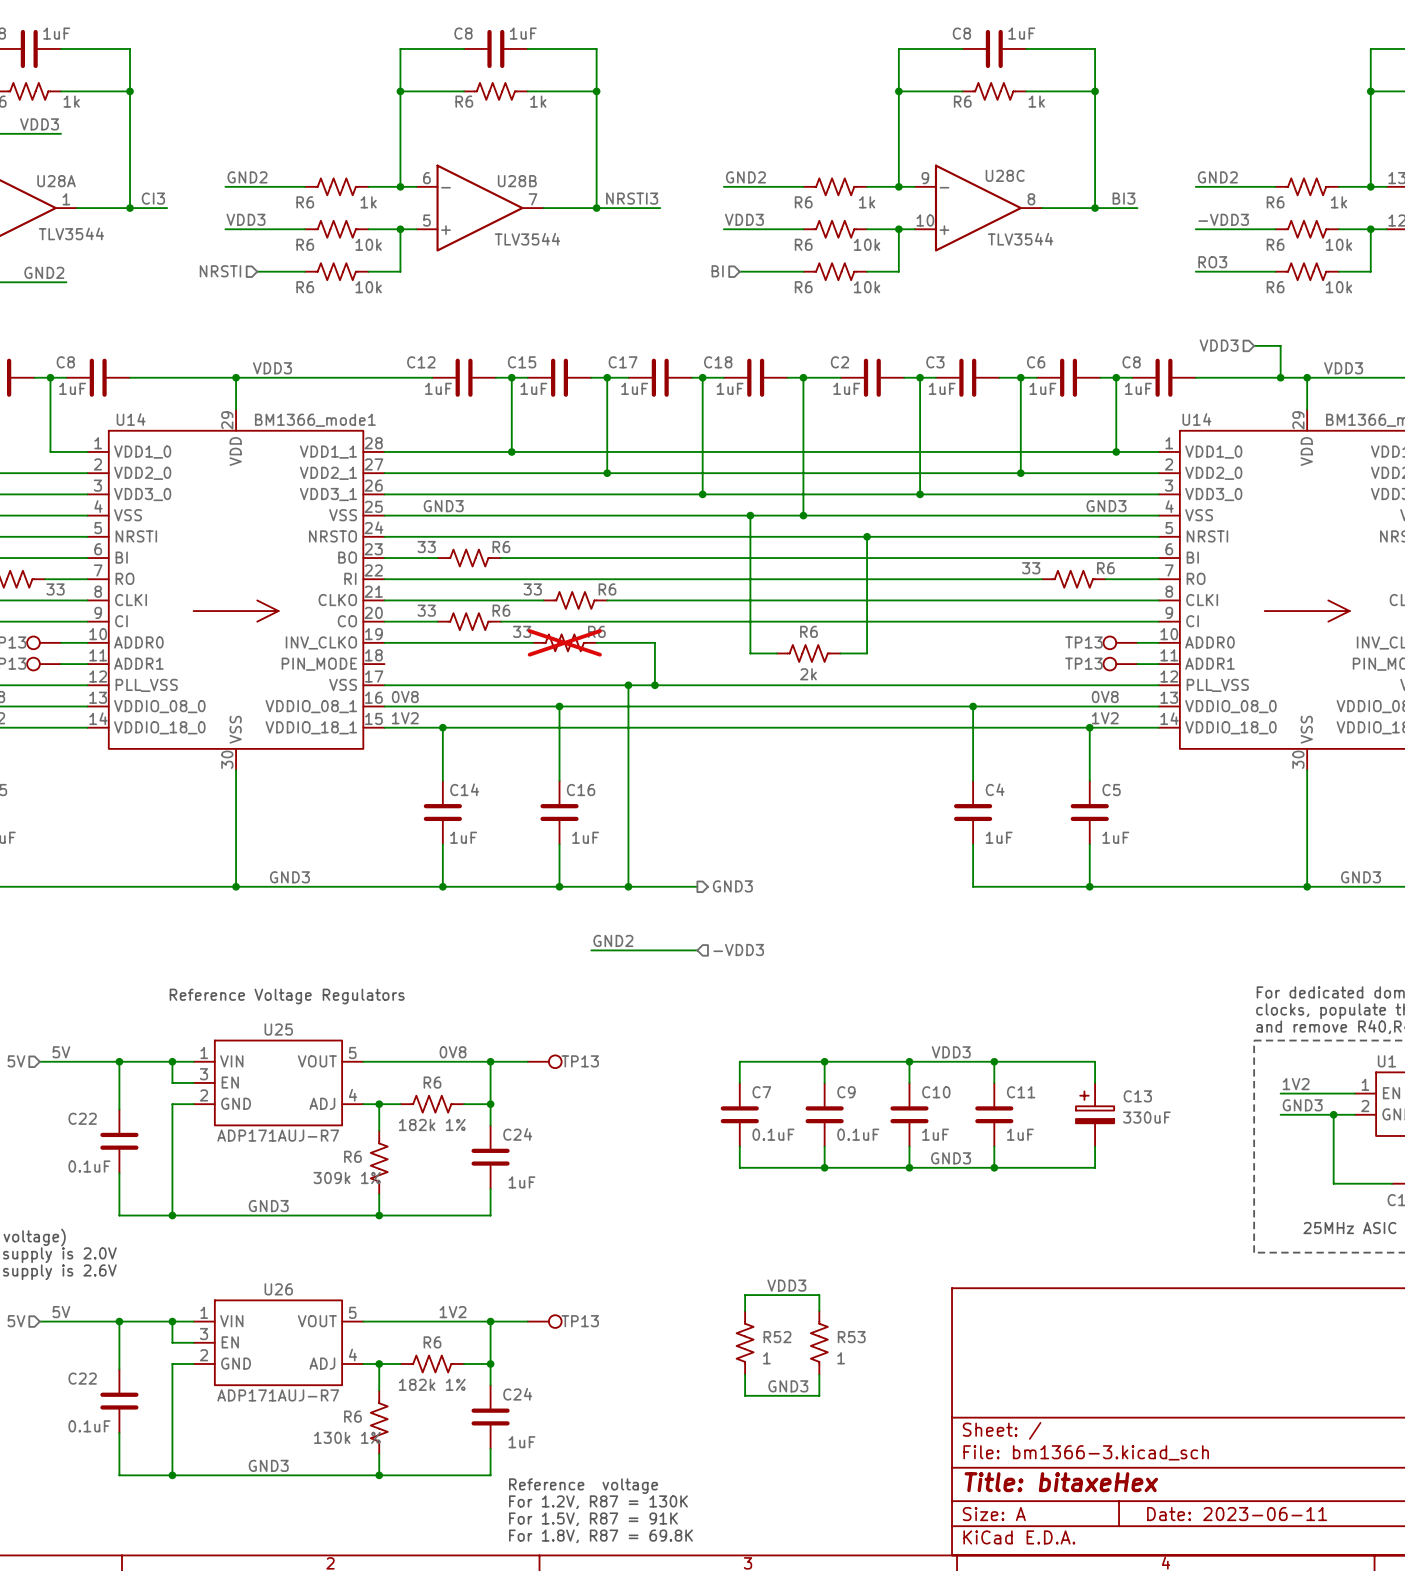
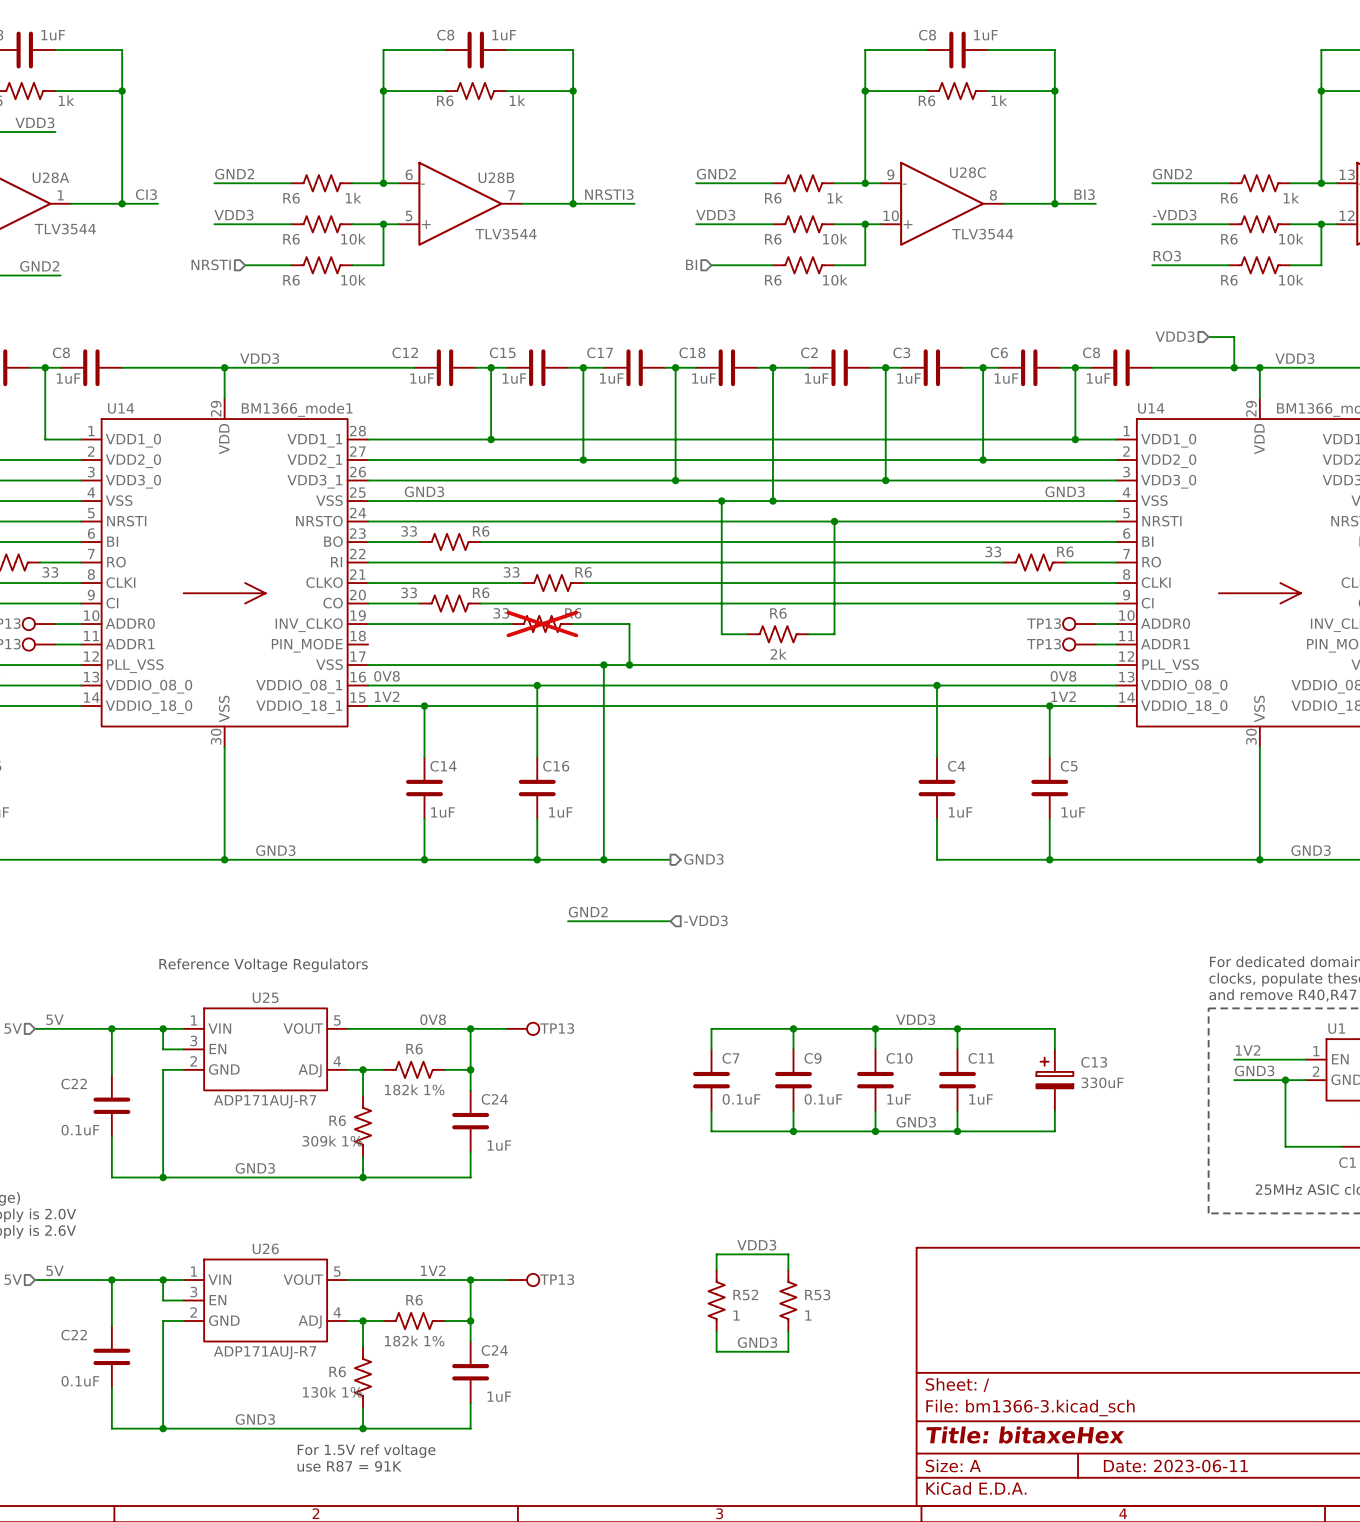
text: Reference voltage (583, 1486) -> none
text: none -> For 1.5V ref voltage (366, 1451)
text: For 1.2V, R87 = 130K (598, 1502) -> none
text: none -> use R87 = 91K (349, 1466)
text: For 1.5V, R87 = 91K (593, 1519) -> none
text: For 1.8V, R87 = 69.8K (601, 1536) -> none

